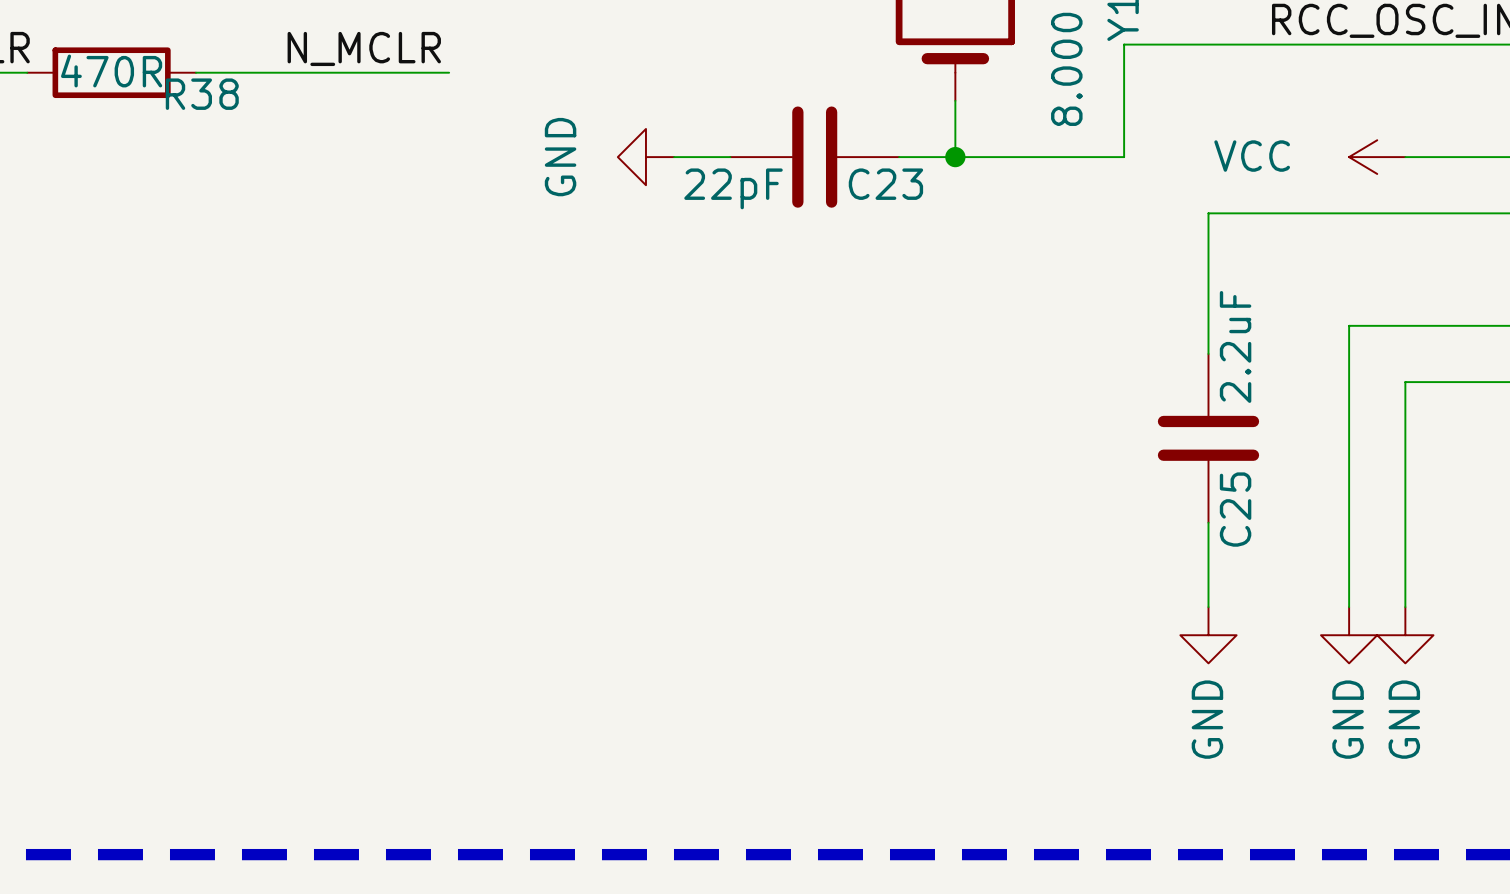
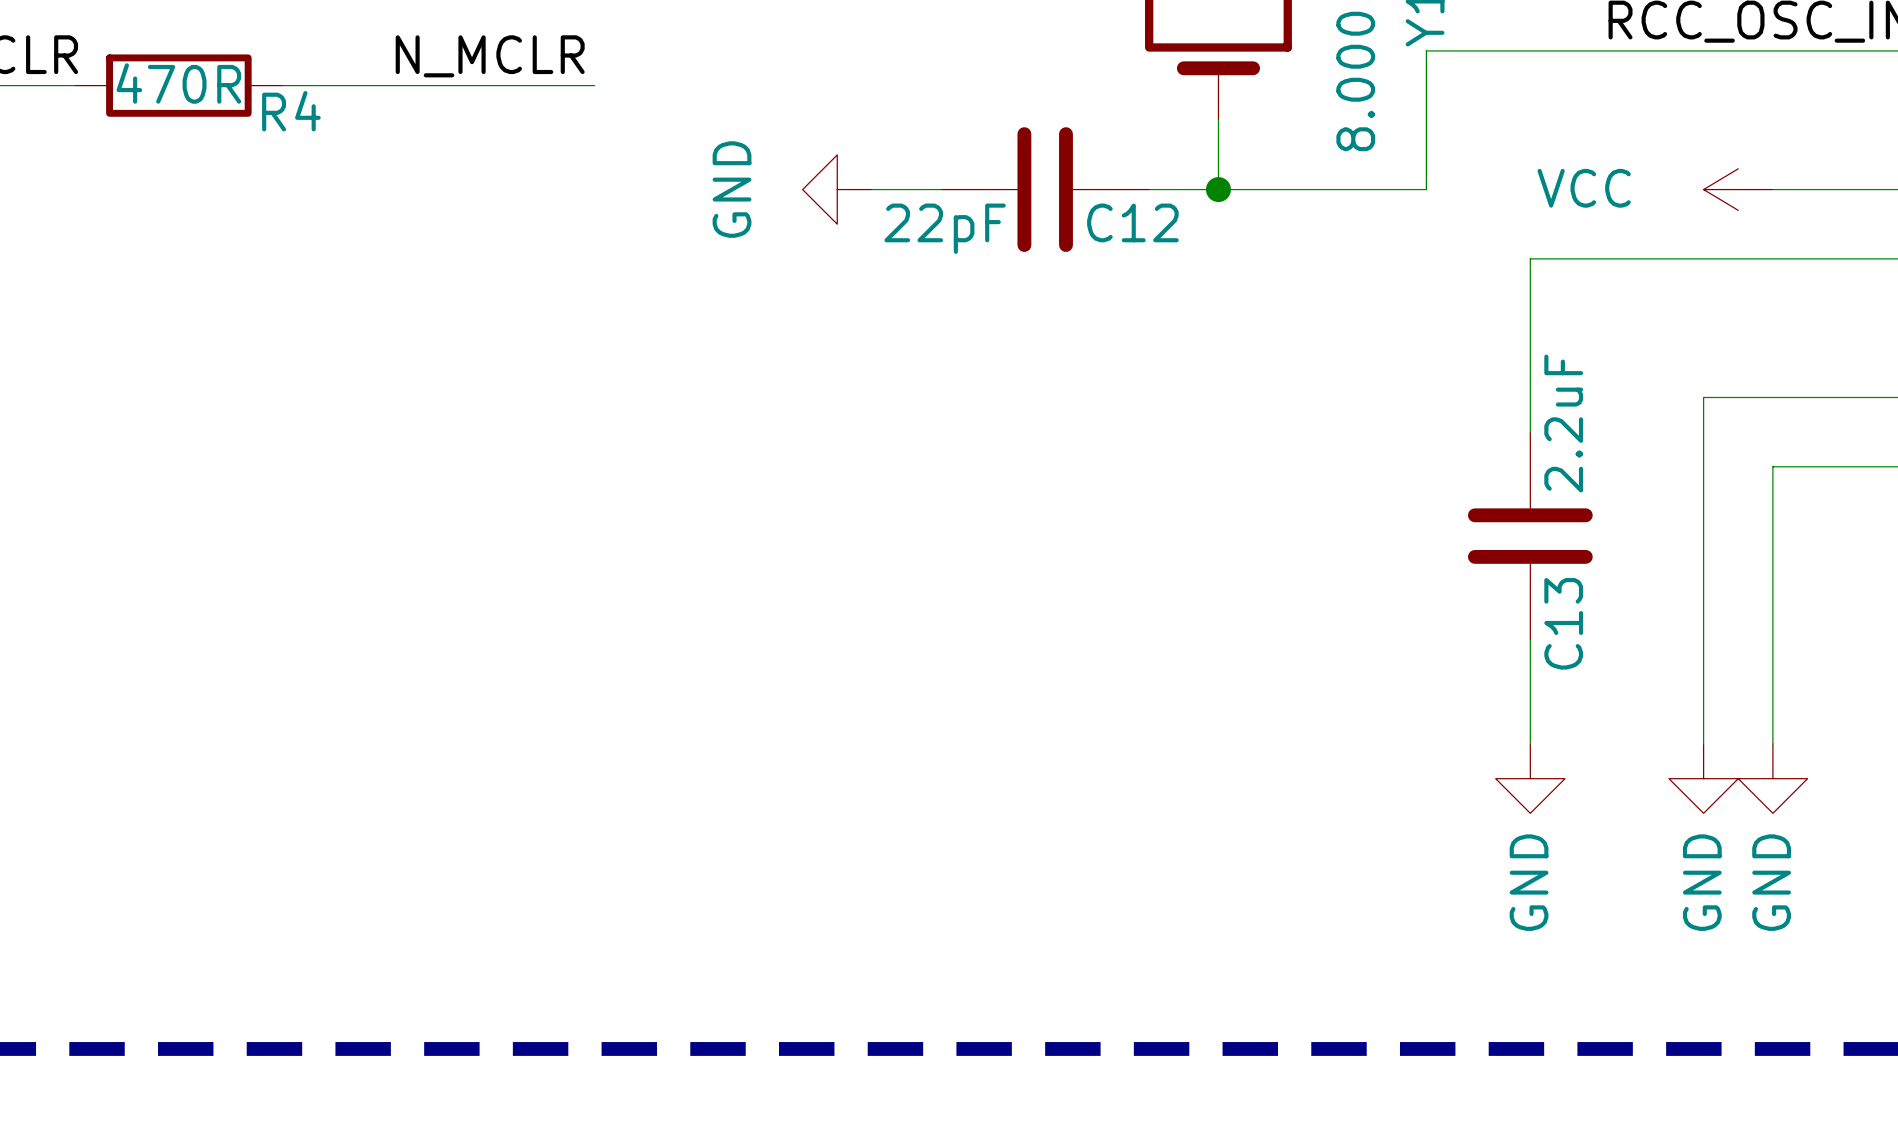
R38 name: R38 (202, 94) -> R4 (291, 111)
C23 name: C23 (885, 184) -> C12 (1132, 222)
C25 name: C25 (1235, 509) -> C13 (1563, 623)

